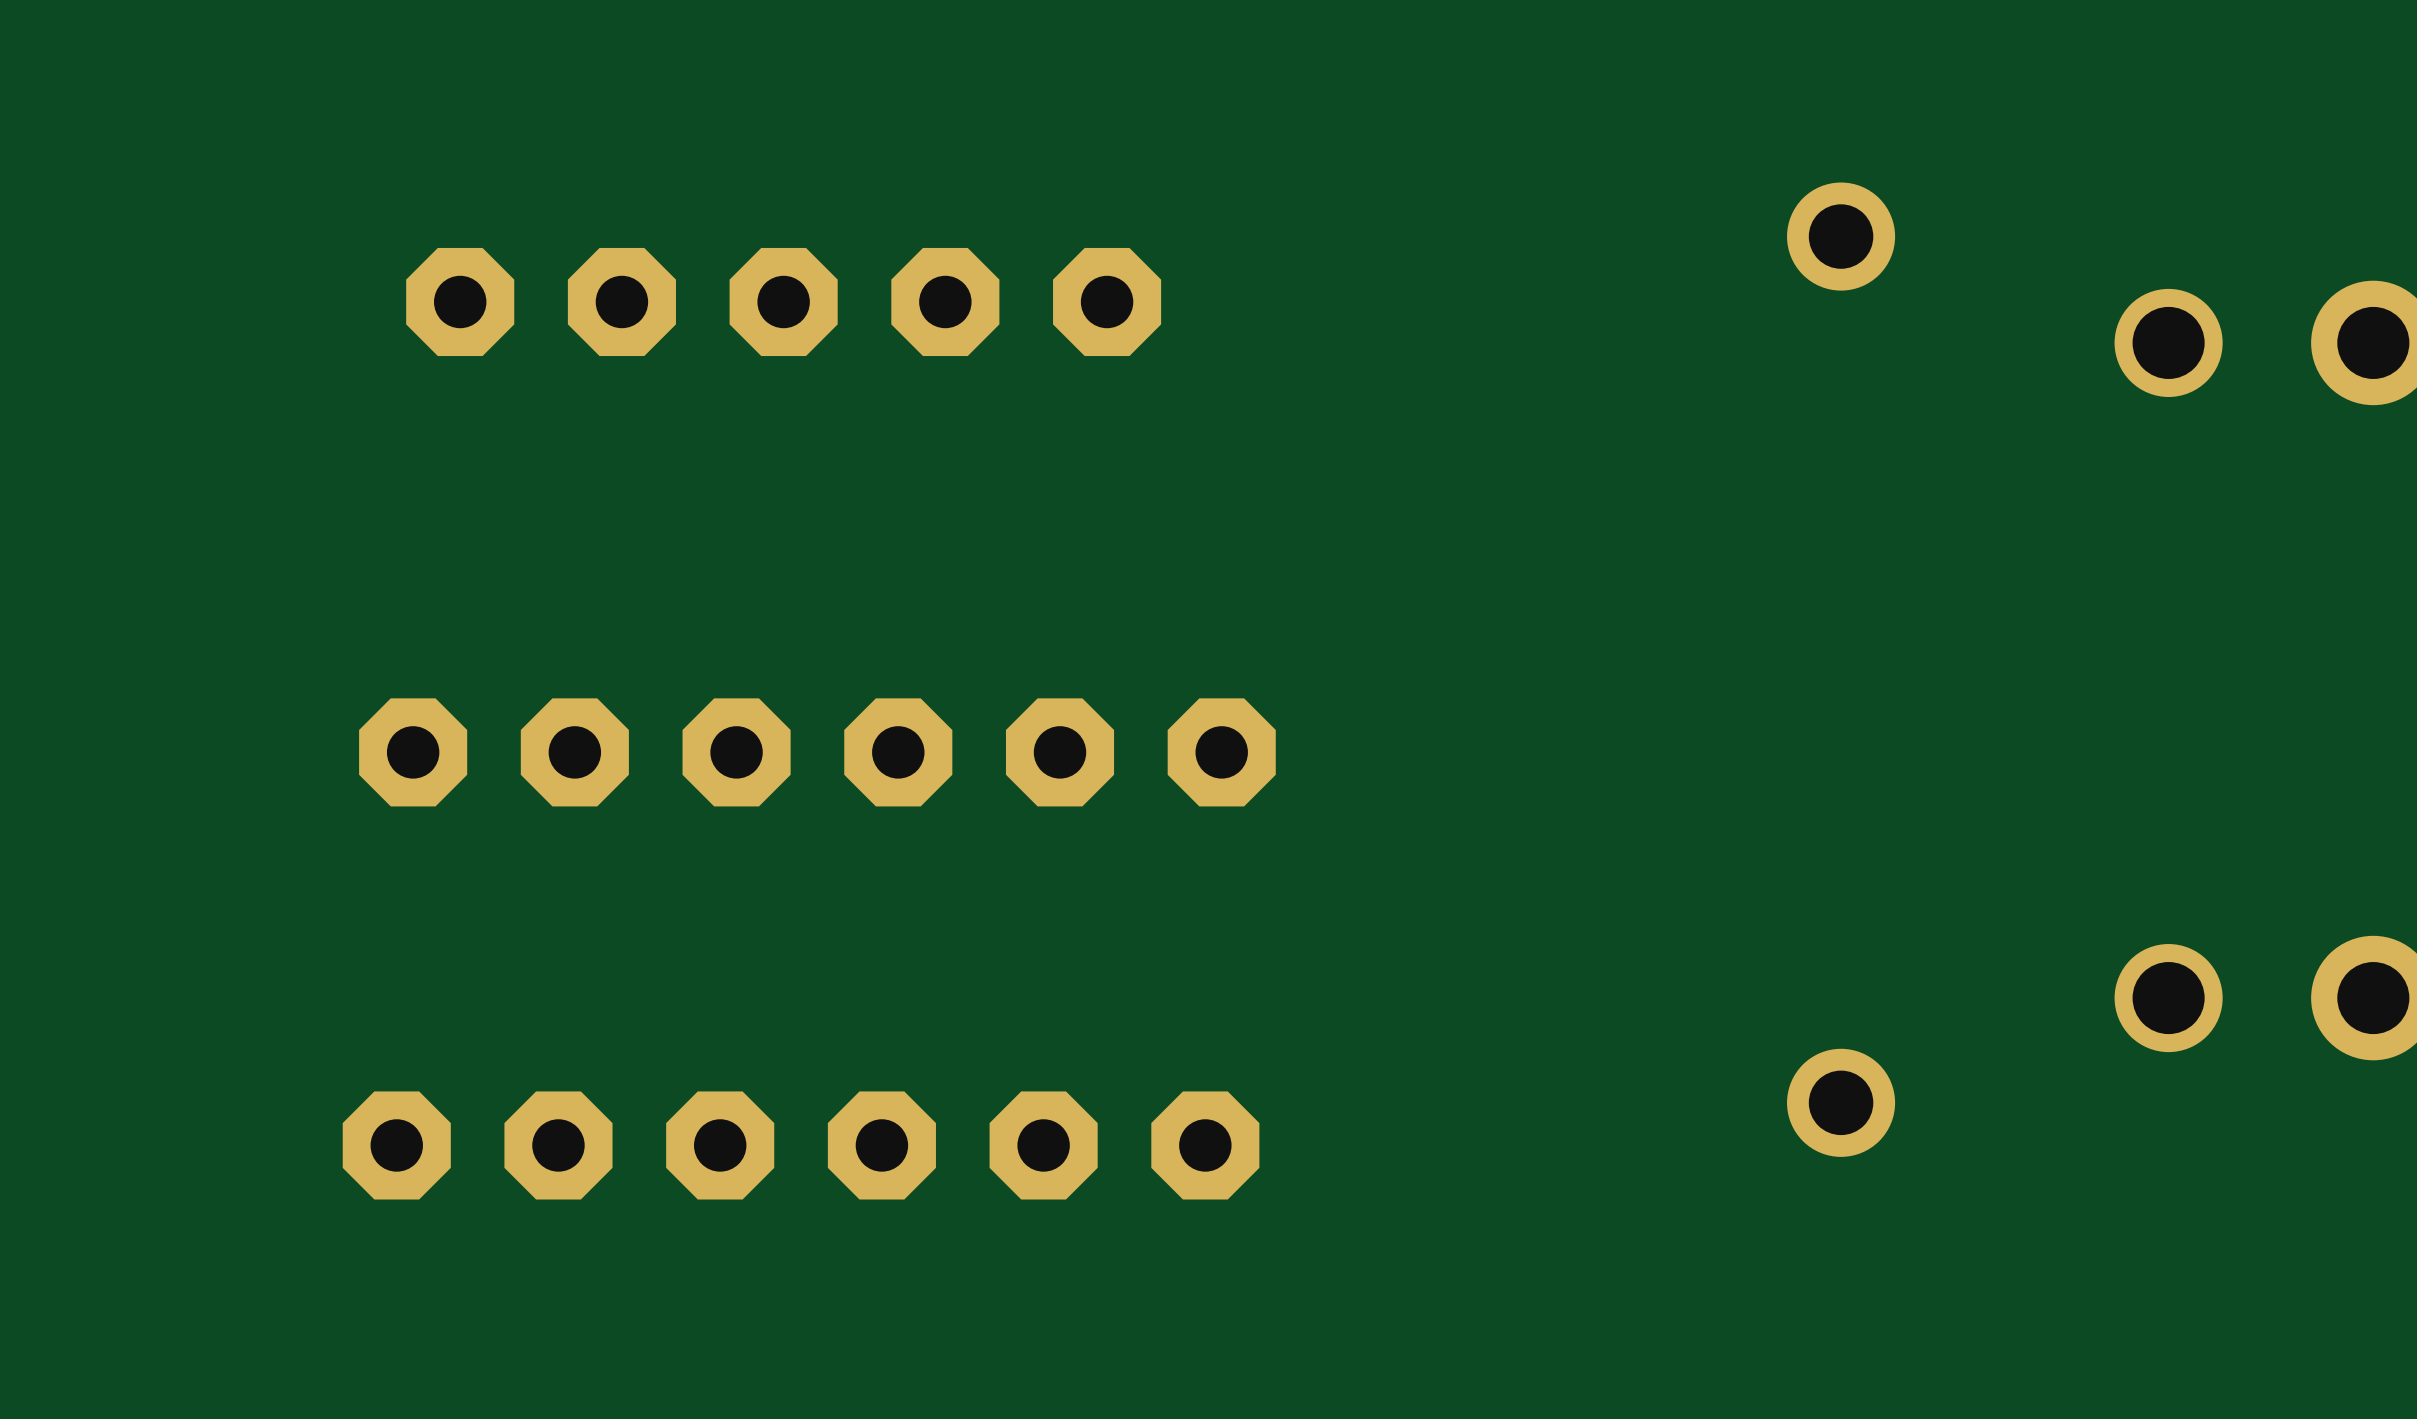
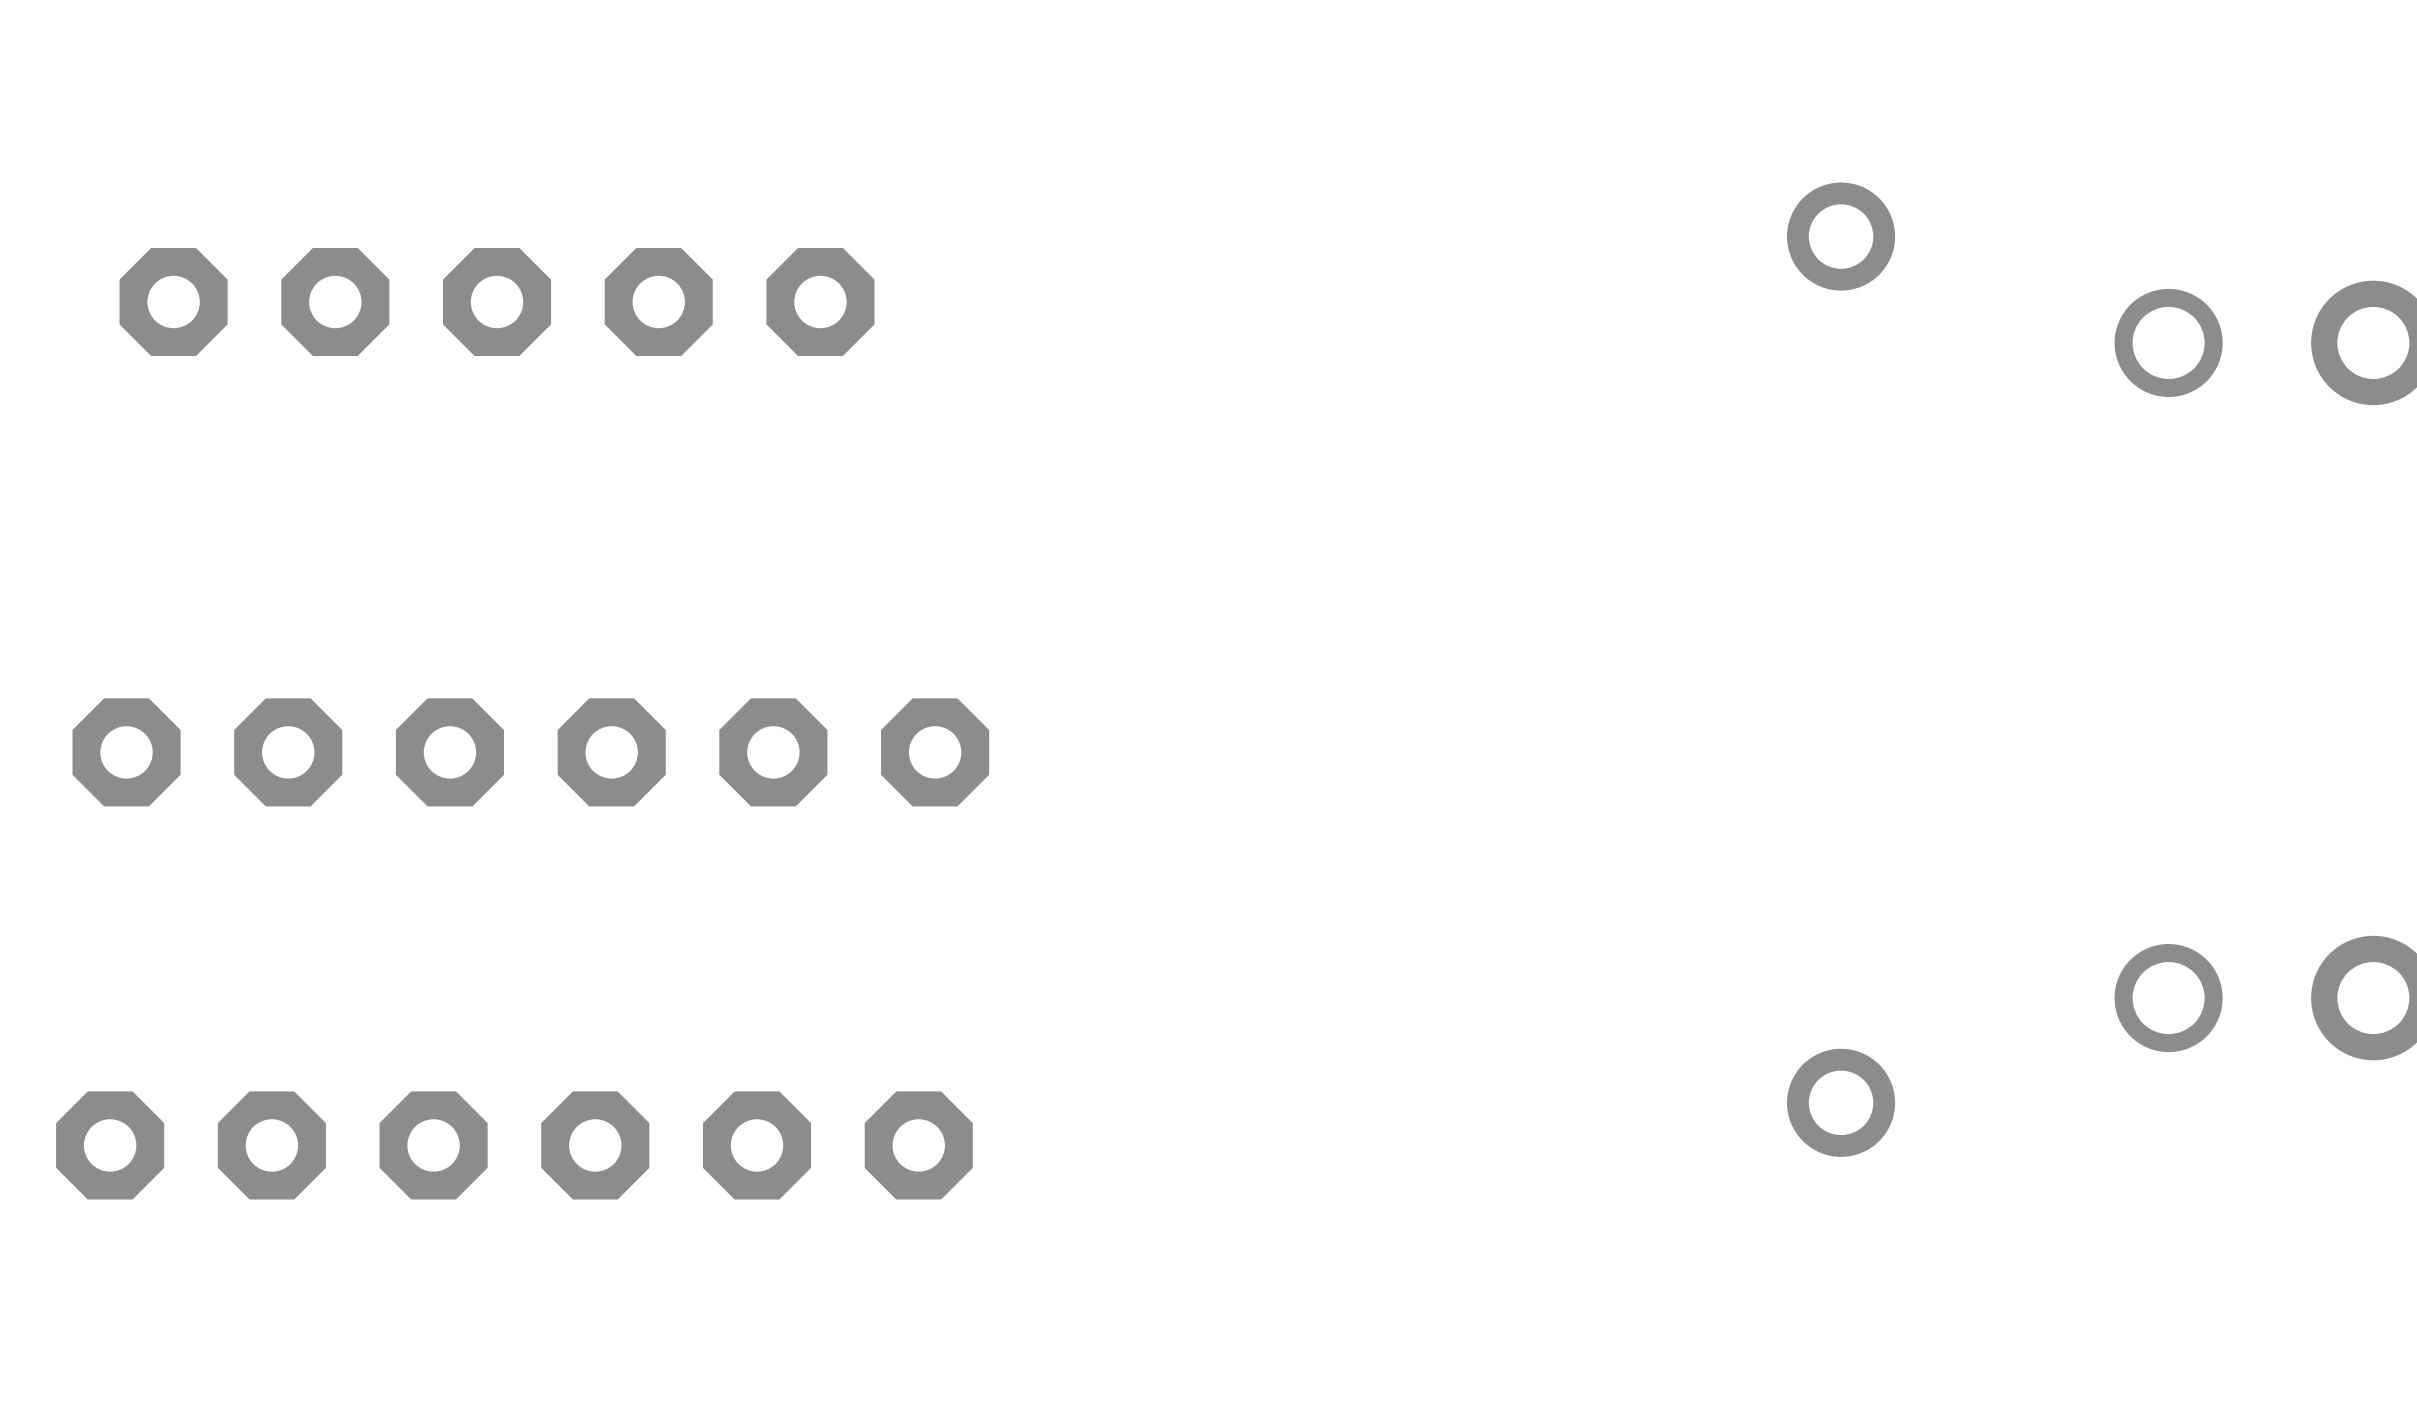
part: none -> (497, 302)
part: (783, 302) -> none
part: none -> (530, 752)
part: (817, 752) -> none
part: none -> (514, 1145)
part: (801, 1145) -> none

